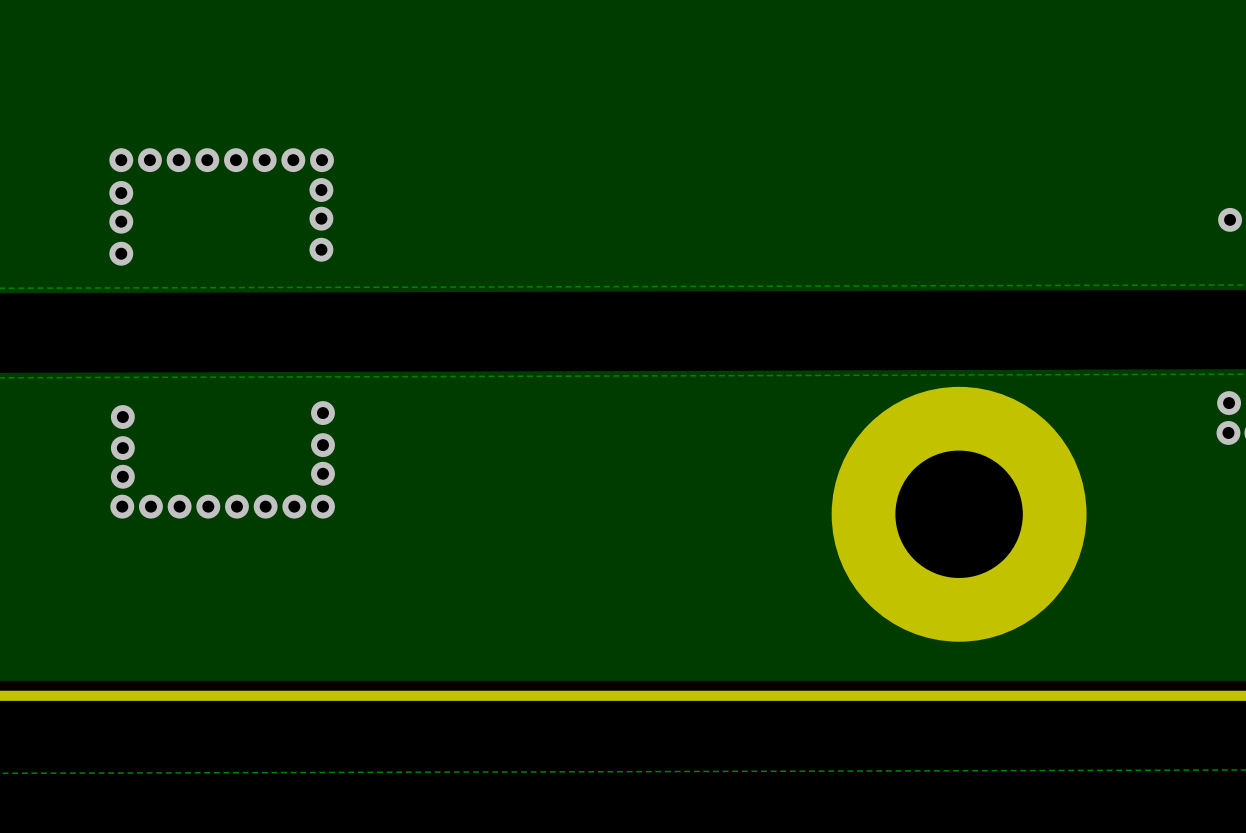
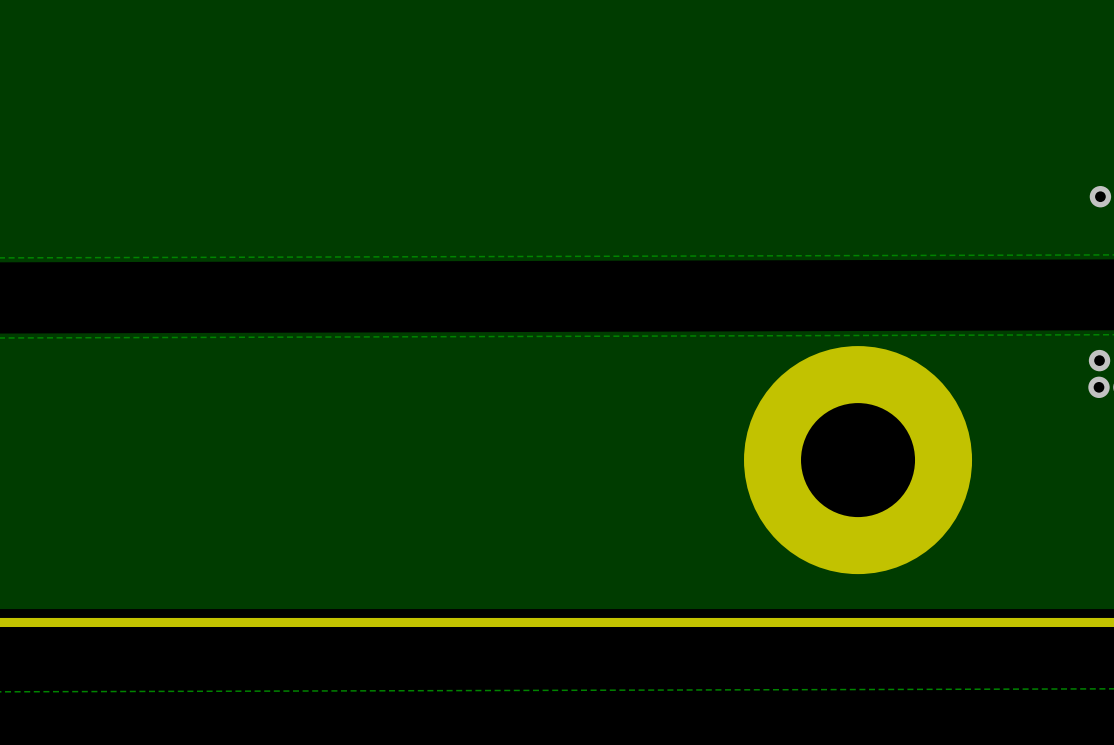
via: (121, 160) -> none
via: (149, 160) -> none
via: (178, 160) -> none
via: (207, 160) -> none
via: (235, 160) -> none
via: (264, 160) -> none
via: (293, 160) -> none
via: (322, 160) -> none
via: (321, 190) -> none
via: (121, 192) -> none
via: (321, 218) -> none
via: (121, 221) -> none
via: (321, 249) -> none
via: (121, 253) -> none
via: (322, 413) -> none
via: (122, 417) -> none
via: (322, 445) -> none
via: (122, 448) -> none
via: (322, 473) -> none
via: (122, 476) -> none
via: (122, 506) -> none
via: (150, 506) -> none
via: (179, 506) -> none
via: (208, 506) -> none
via: (236, 506) -> none
via: (265, 506) -> none
via: (294, 506) -> none
via: (322, 506) -> none

